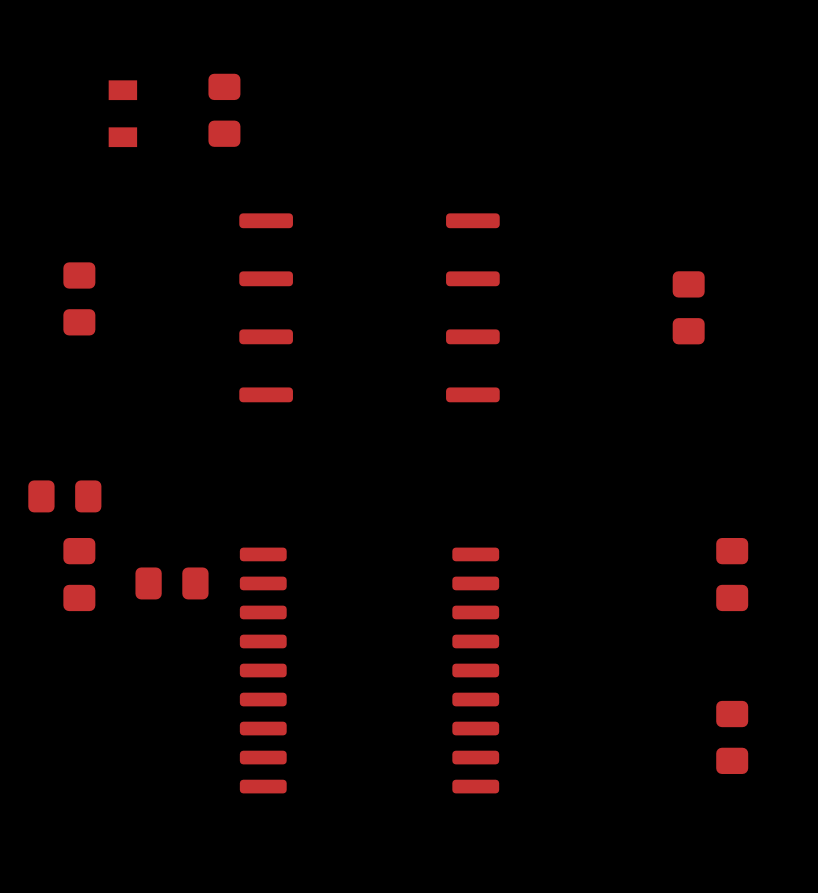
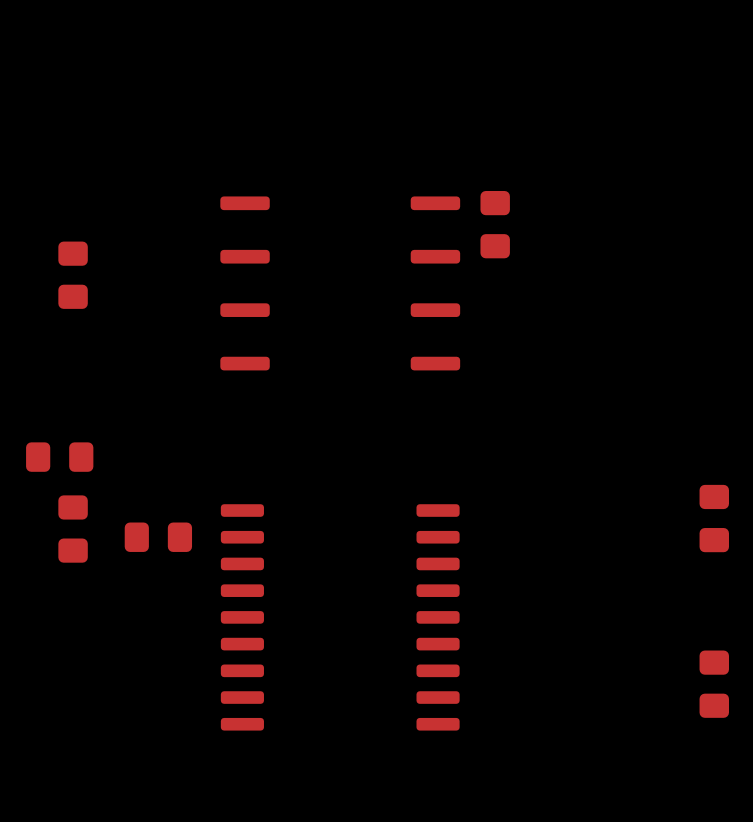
part: (224, 110) -> none
part: (122, 113) -> none
part: none -> (495, 224)
part: (688, 307) -> none
part position: (732, 574) -> (714, 518)
part position: (732, 737) -> (714, 684)

